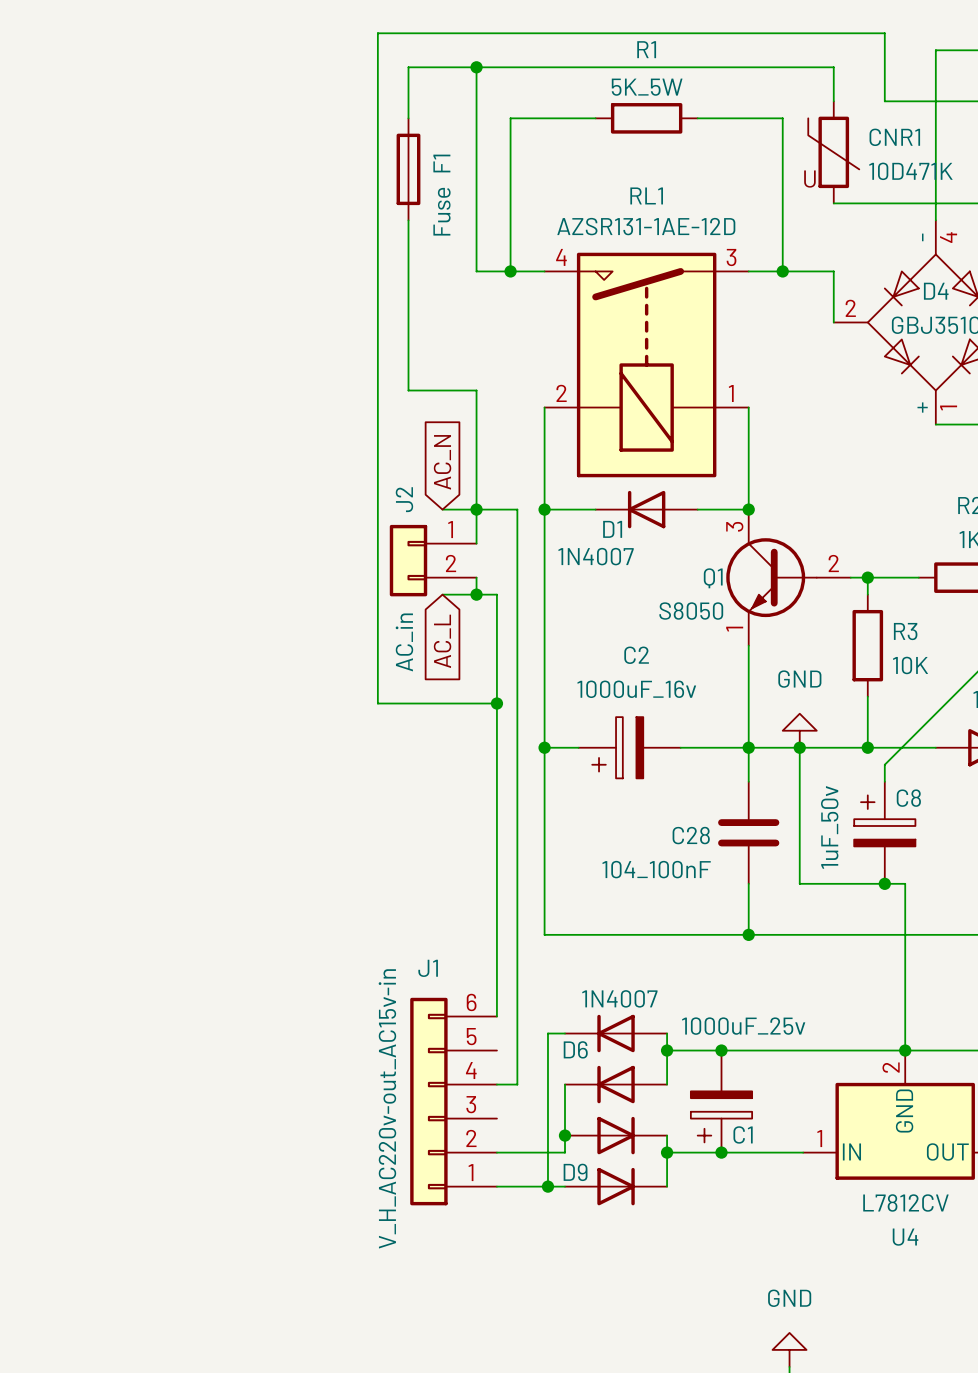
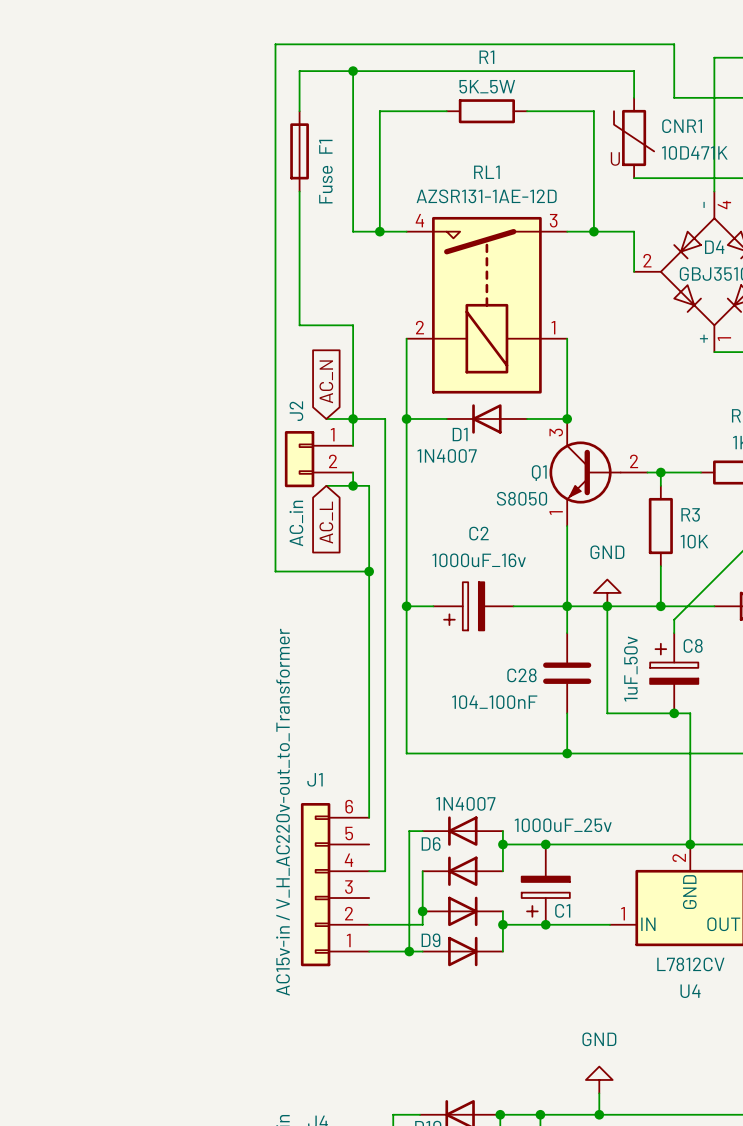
J1 value: V_H_AC220v-out_AC15v-in (387, 1108) -> AC15v-in / V_H_AC220v-out_to_Transformer (283, 812)

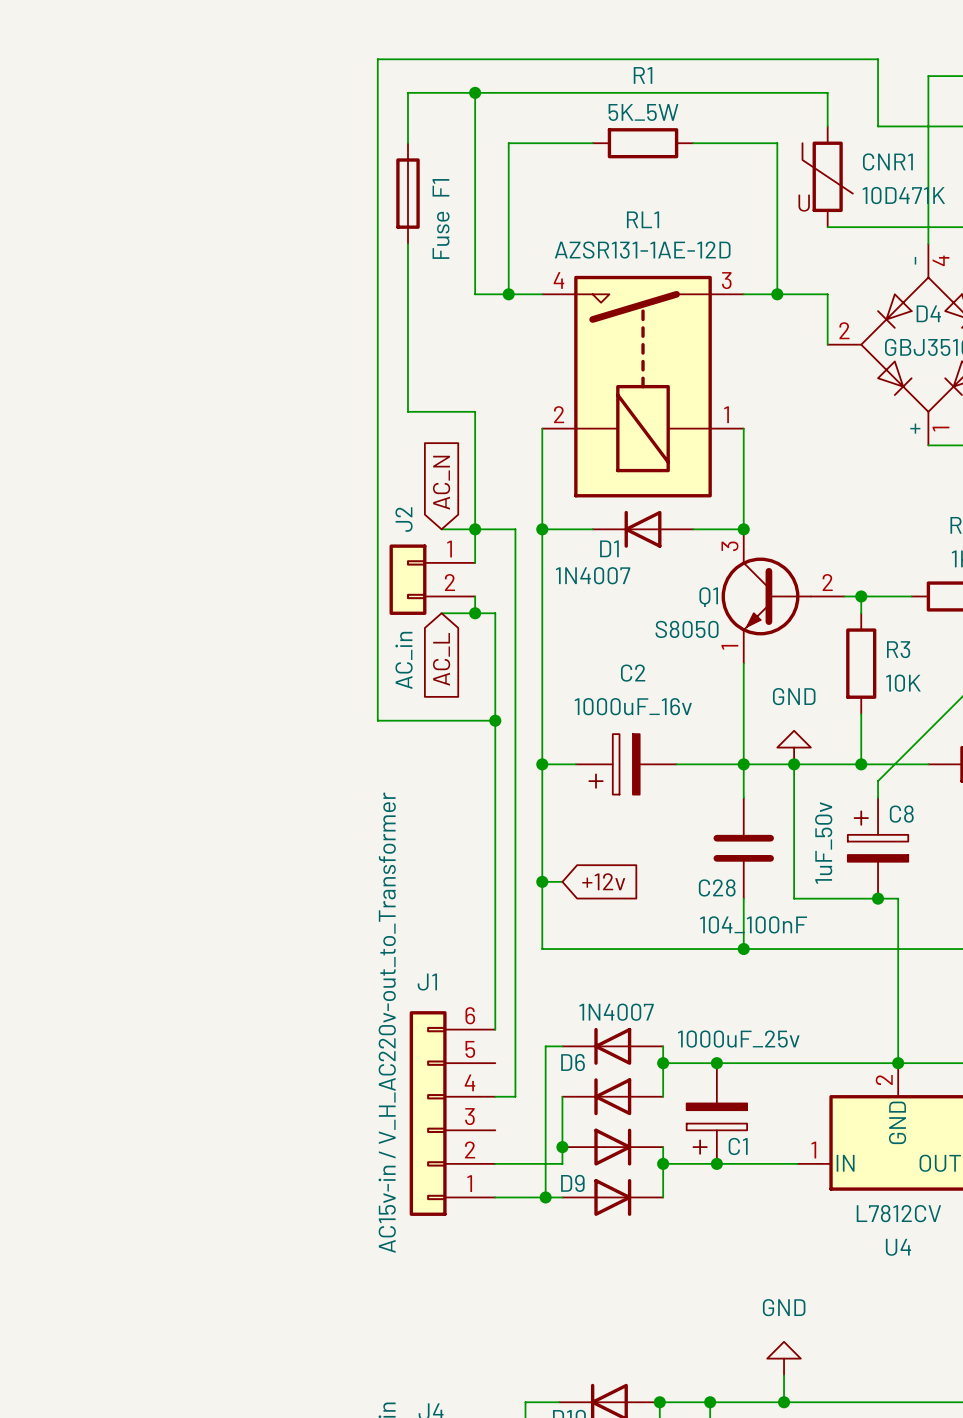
C28 name position: C28 (521, 675) -> C28 (717, 887)
wire: none -> (542, 881) (562, 881)
junction: none -> (542, 881)
global label: none -> +12v (603, 881)
C28 value position: 104_100nF (494, 702) -> 104_100nF (753, 924)

